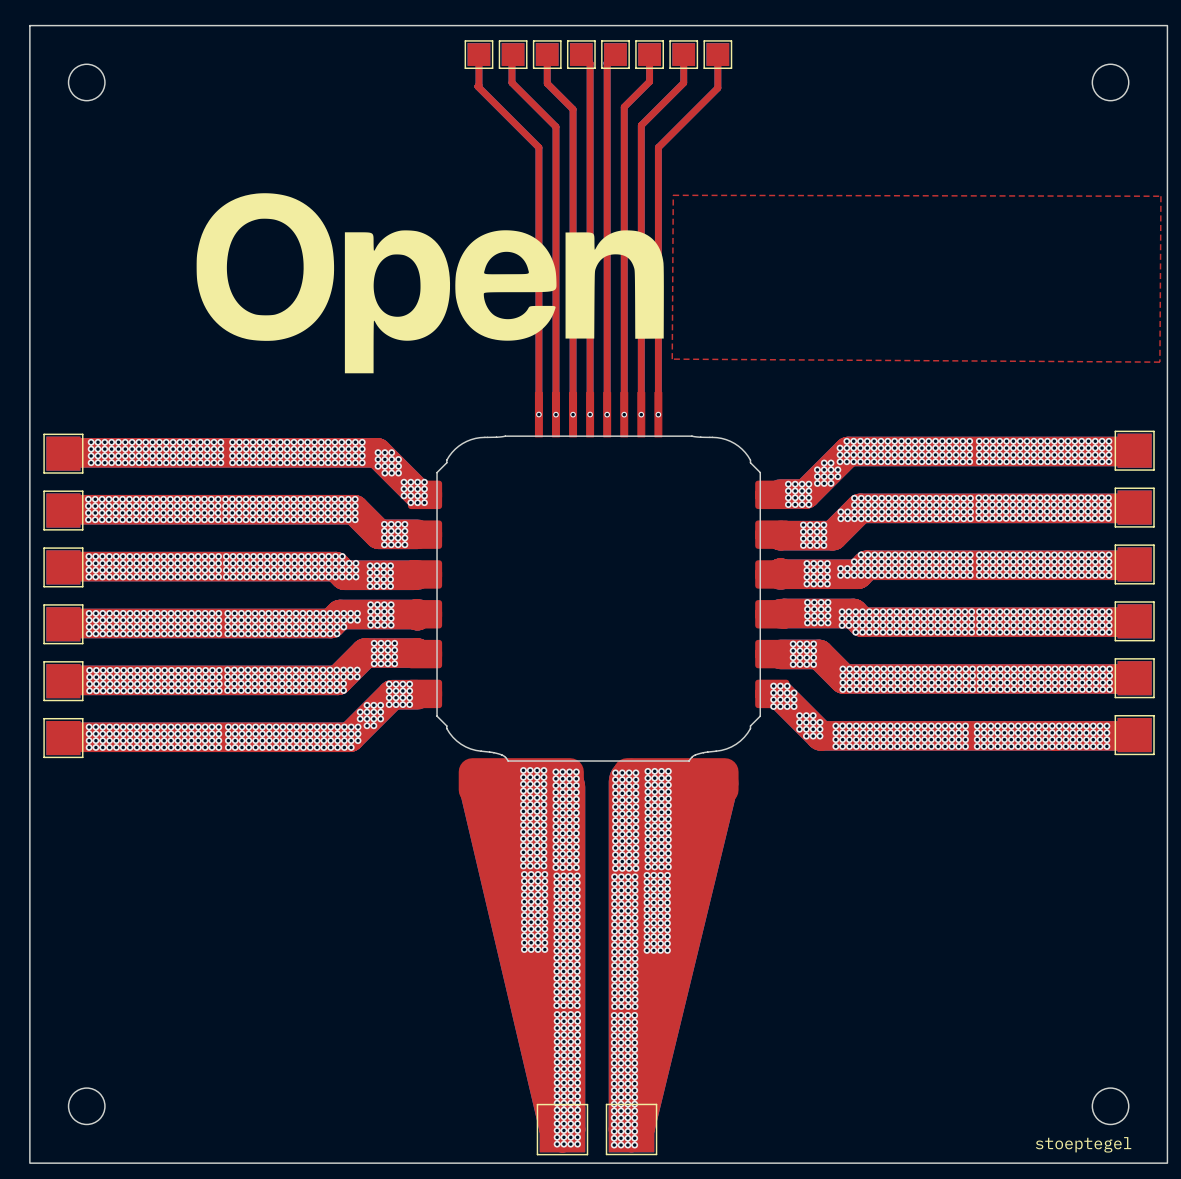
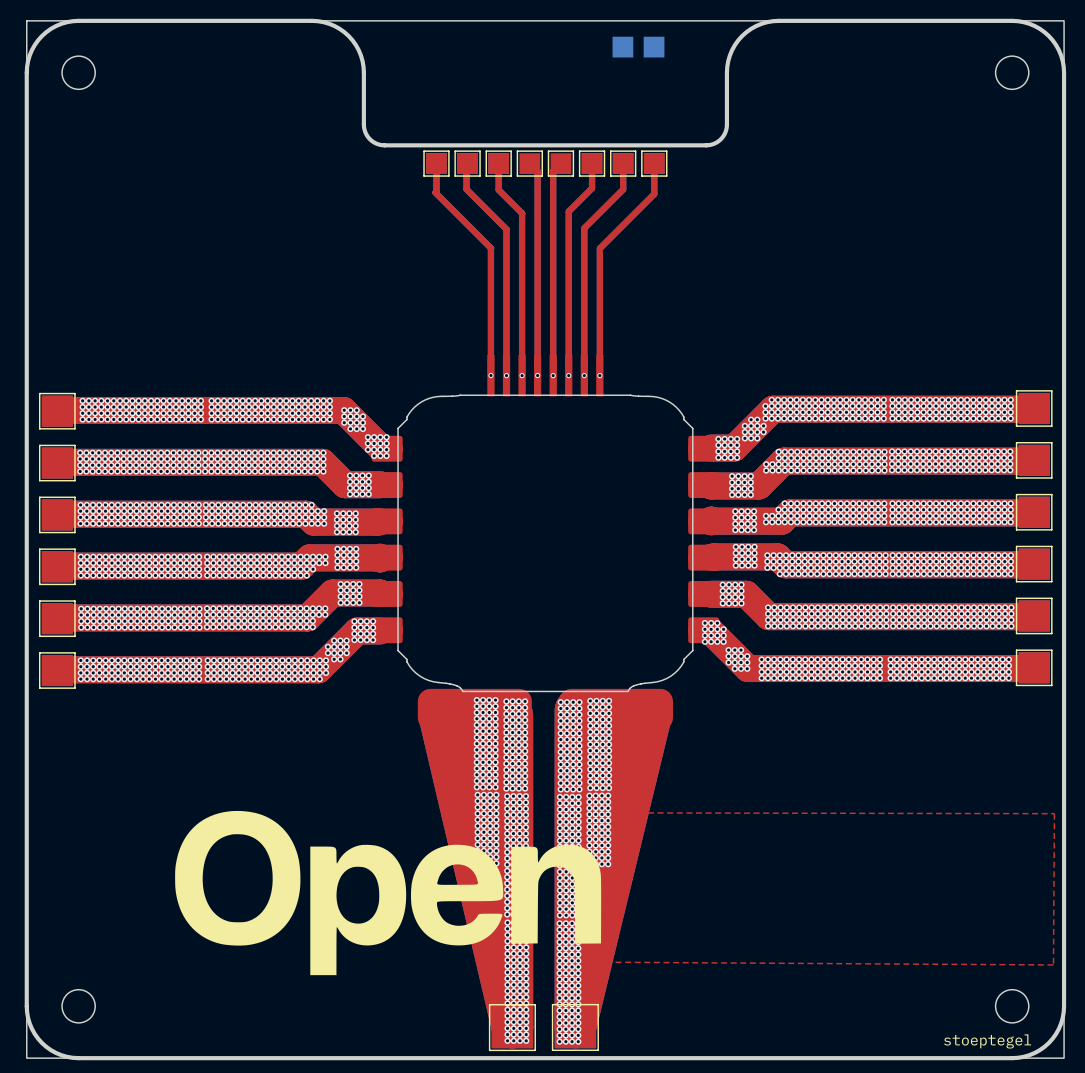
board edge: none -> (78, 20) (312, 20) (329, 23) (344, 32) (358, 50) (363, 66) (364, 129) (371, 140) (384, 145) (713, 144) (720, 139) (726, 129) (727, 66) (732, 50) (742, 36) (751, 28) (772, 21) (1012, 20) (1029, 23) (1048, 36) (1061, 55) (1064, 72) (1064, 1006) (1058, 1028) (1048, 1042) (1034, 1053) (1012, 1058) (78, 1058) (61, 1055) (41, 1042) (29, 1023) (26, 1006) (26, 72) (29, 55) (41, 36) (61, 23) (78, 20)
top track: (514, 47) (511, 49) (511, 82) (555, 126) (555, 254) -> none
top track: (478, 54) (477, 86) (538, 147) (538, 275) -> none
part: (478, 54) -> none
part: (513, 54) -> none
top track: (547, 54) (547, 83) (573, 109) (573, 237) -> none
part: (547, 54) -> none
top track: (581, 54) (590, 63) (590, 191) -> none
part: (581, 54) -> none
top track: (615, 54) (607, 62) (607, 191) -> none
part: (615, 54) -> none
top track: (649, 54) (649, 81) (624, 107) (624, 235) -> none
part: (649, 54) -> none
top track: (683, 54) (683, 82) (641, 125) (641, 253) -> none
part: (683, 54) -> none
top track: (717, 54) (717, 88) (658, 147) (658, 275) -> none
part: (717, 54) -> none
top track: none -> (468, 156) (466, 159) (466, 189) (506, 229)
top track: none -> (436, 163) (435, 192) (491, 248)
part: none -> (436, 163)
part: none -> (467, 163)
top track: none -> (498, 163) (498, 189) (522, 213)
part: none -> (498, 163)
part: none -> (529, 163)
part: none -> (560, 163)
top track: none -> (592, 163) (592, 188) (568, 211)
part: none -> (592, 163)
top track: none -> (623, 163) (623, 189) (584, 228)
part: none -> (623, 163)
top track: none -> (654, 163) (654, 194) (600, 248)
part: none -> (654, 163)
drawing: [196, 193, 664, 374] -> none
top zone outline: (673, 195) (1160, 196) (1159, 362) (672, 359) (673, 195) -> none
drawing: none -> [175, 810, 602, 976]
top zone outline: none -> (609, 812) (1054, 813) (1053, 964) (608, 962) (609, 812)

